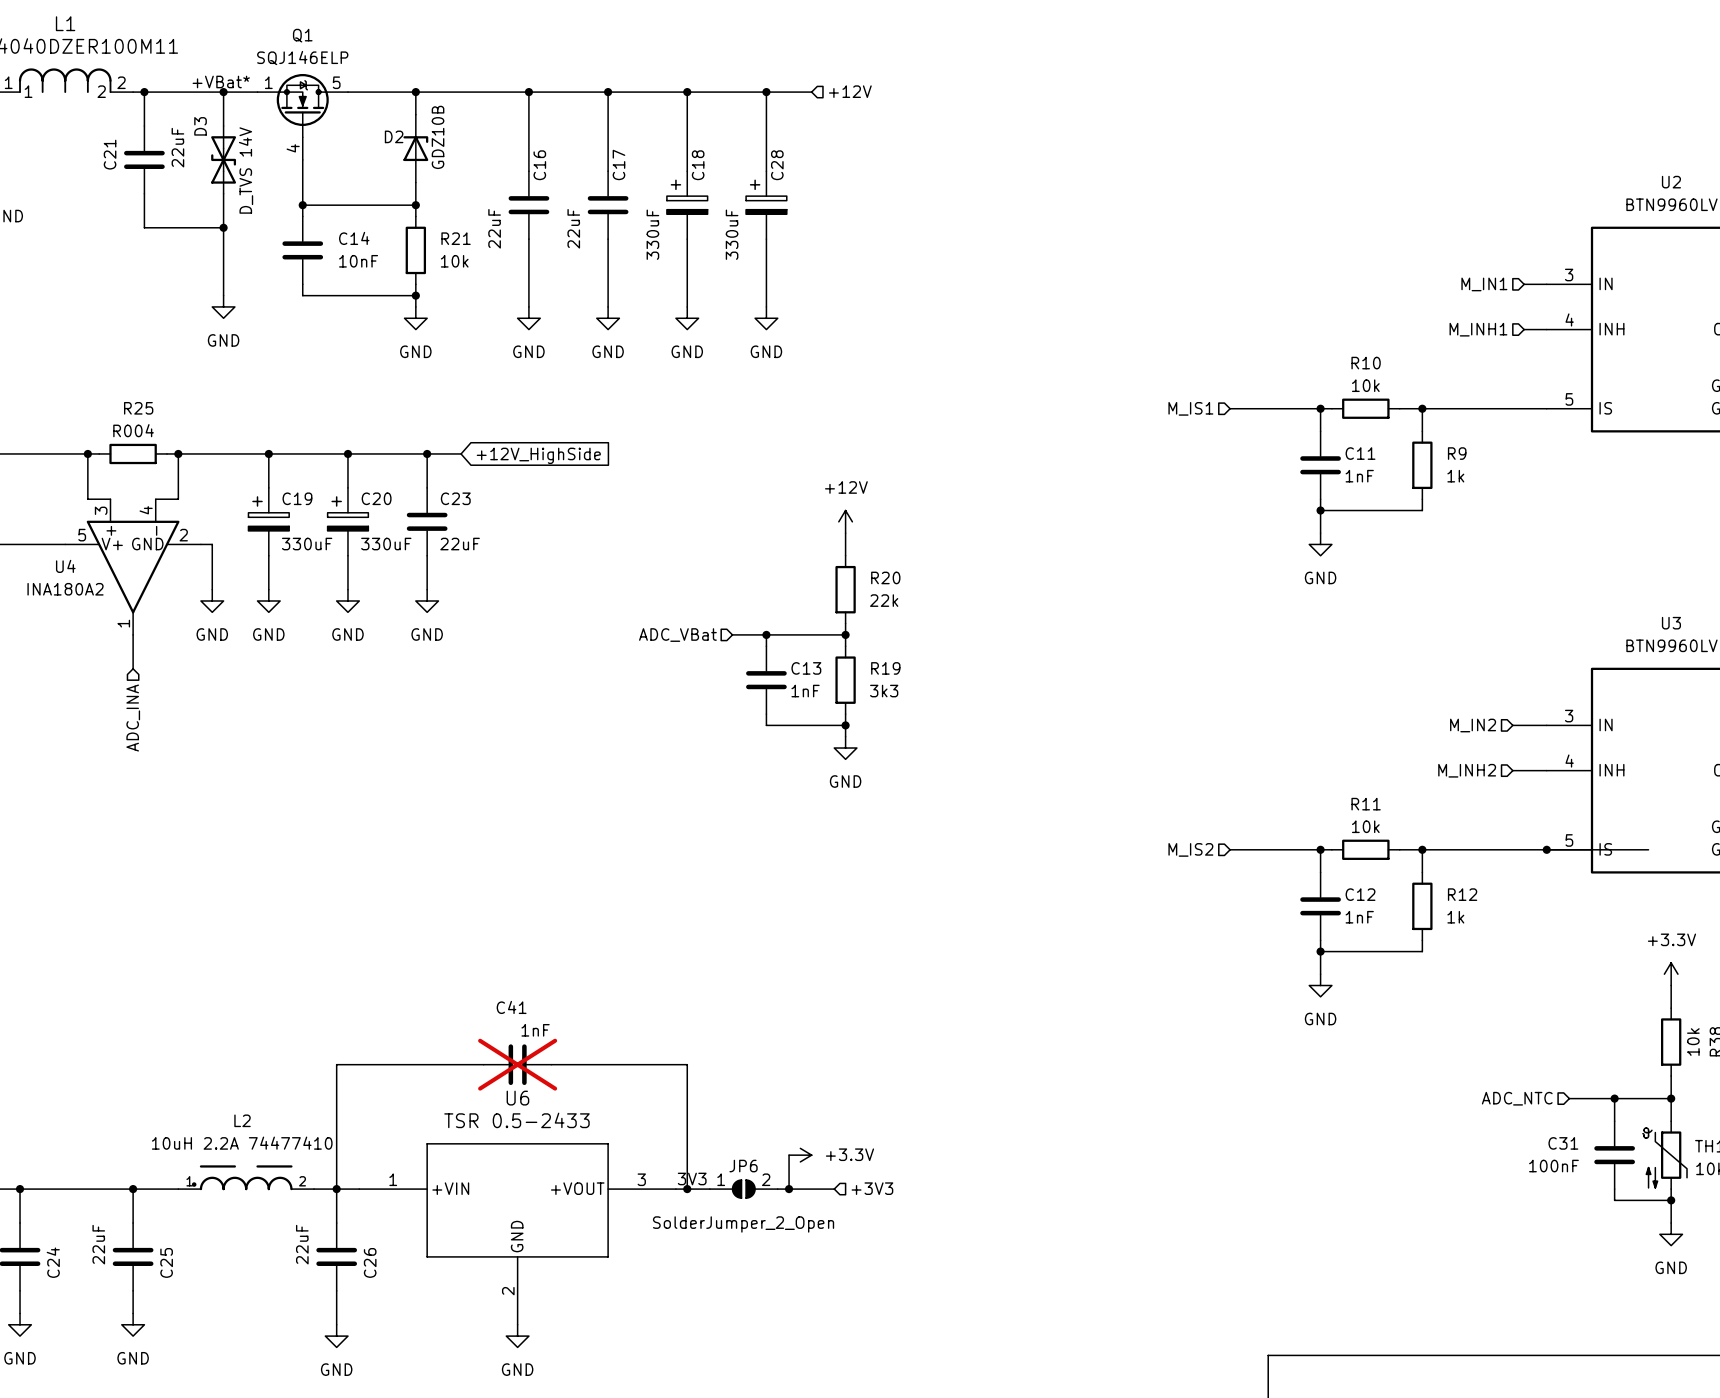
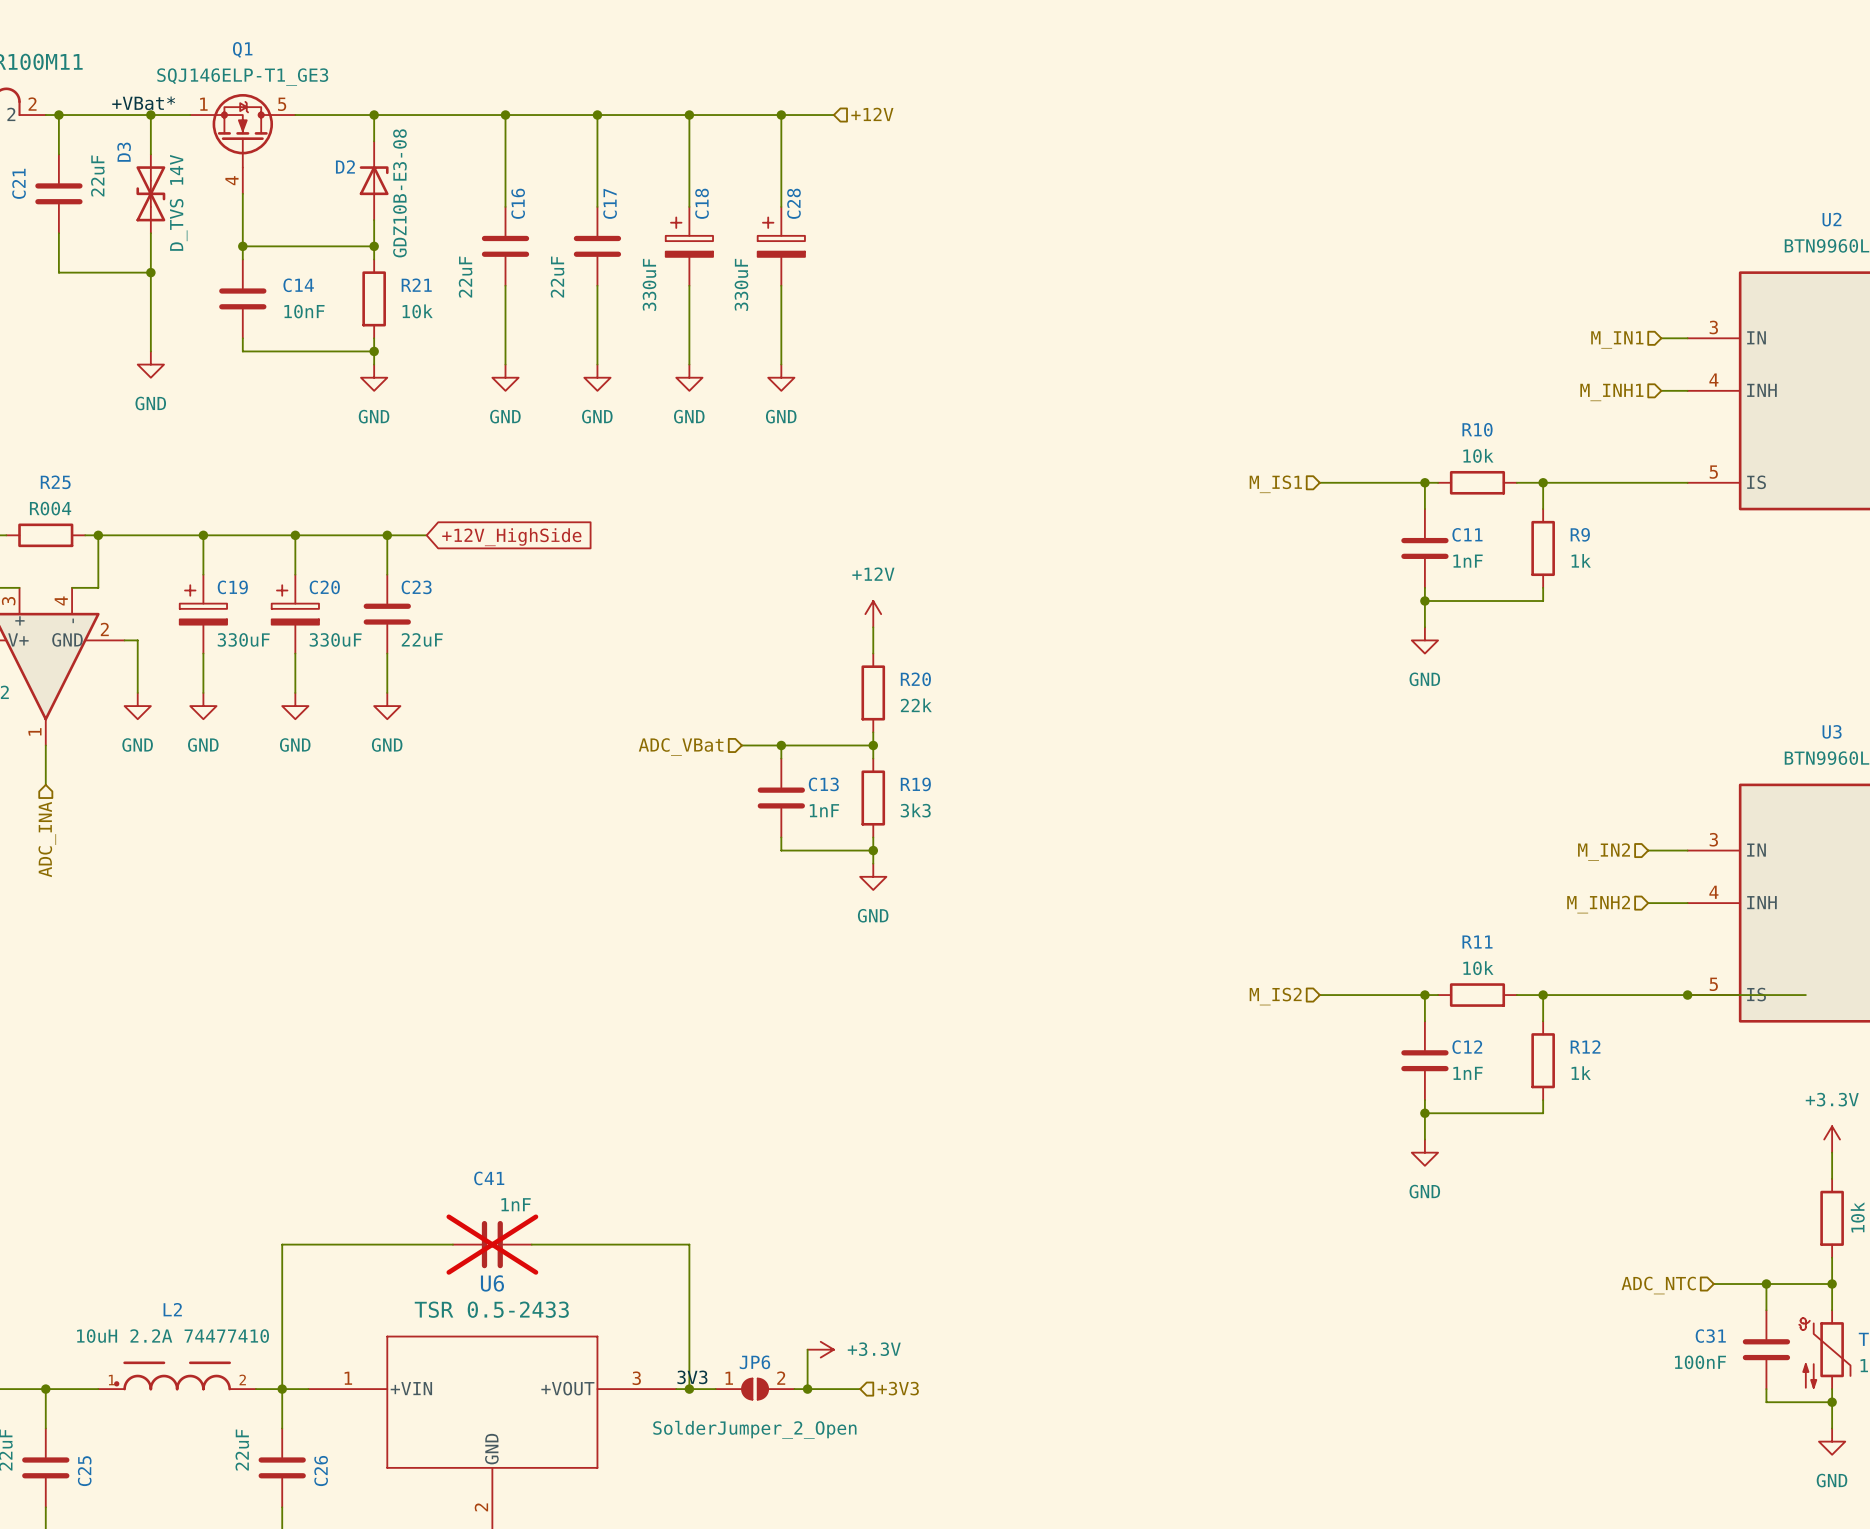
Q1 value: SQJ146ELP (302, 57) -> SQJ146ELP-T1_GE3 (242, 77)
D2 value: GDZ10B (438, 137) -> GDZ10B-E3-08 (399, 193)

